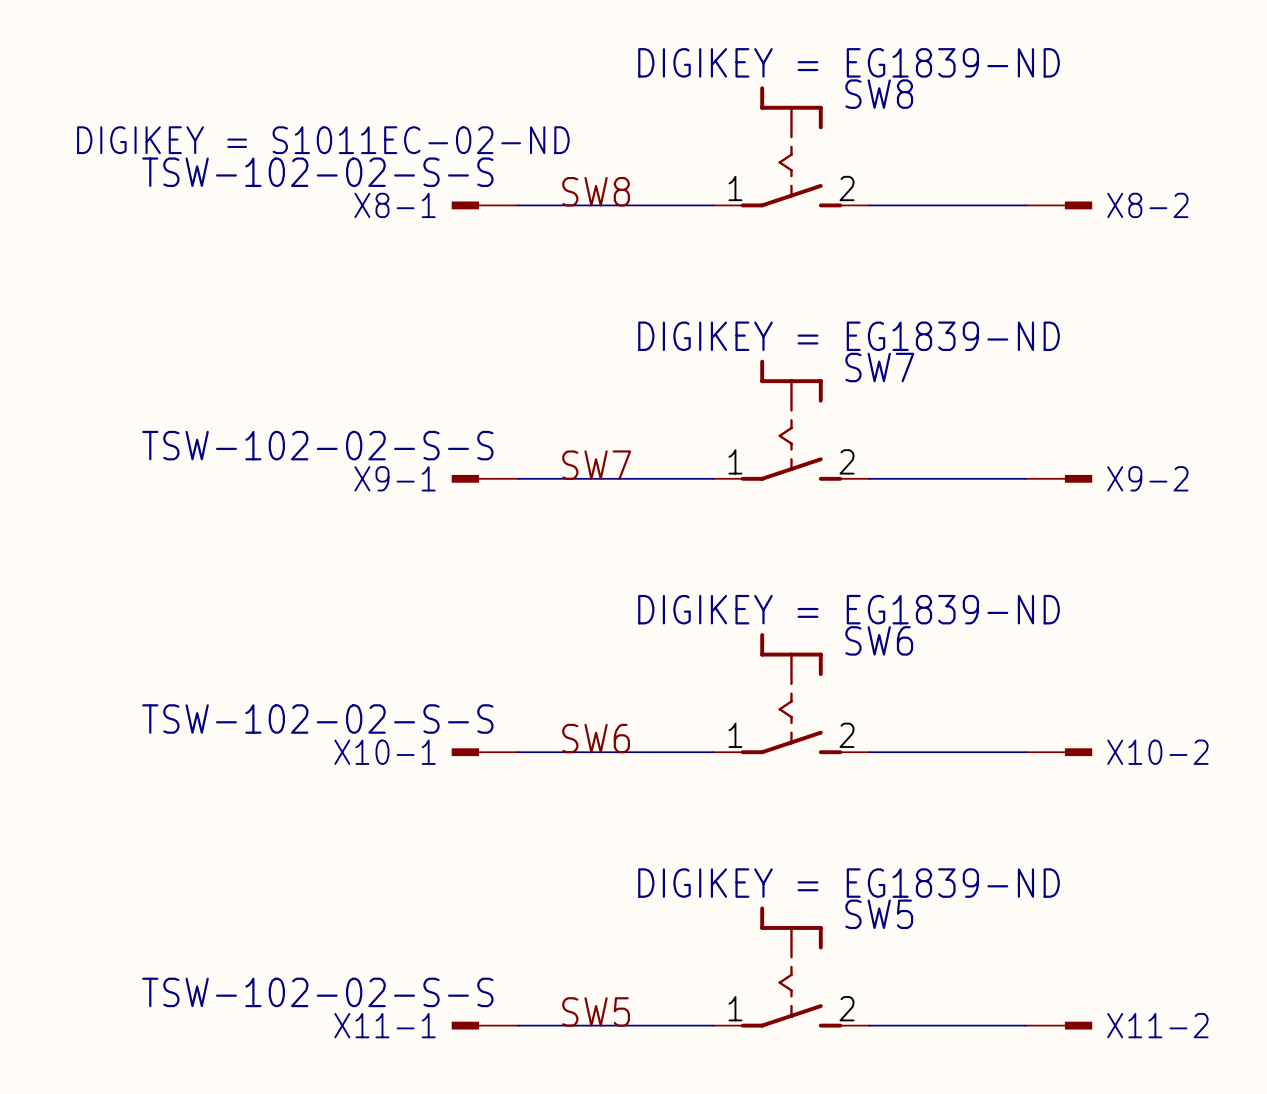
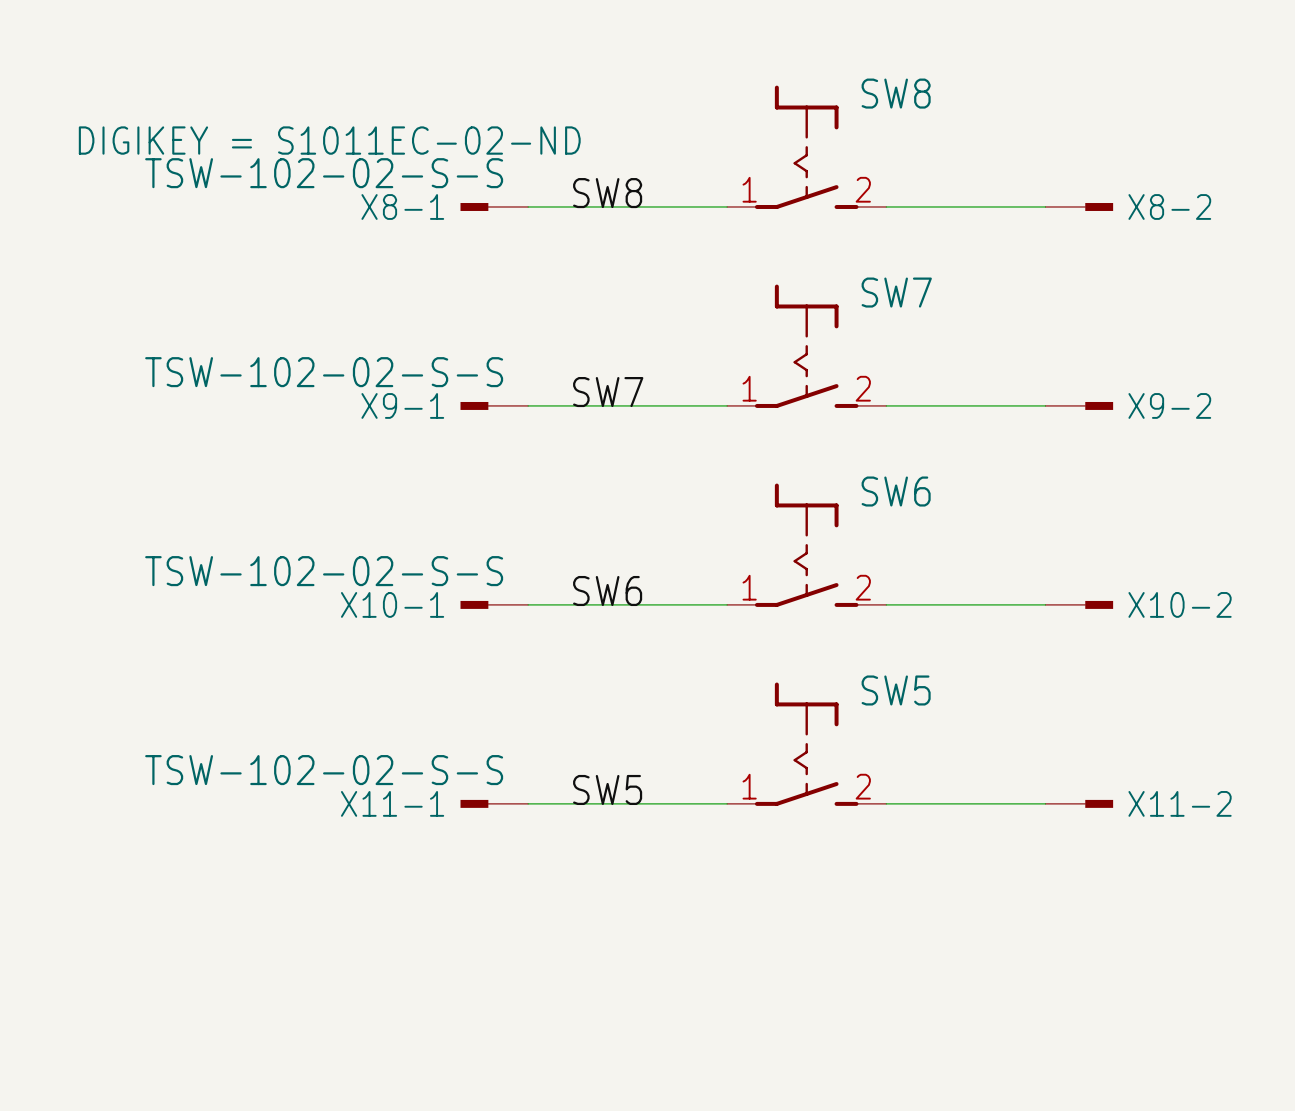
SW8 text: DIGIKEY = EG1839-ND (849, 62) -> none
SW7 text: DIGIKEY = EG1839-ND (849, 336) -> none
SW7 position: (791, 420) -> (806, 346)
label position: SW7 (596, 465) -> SW7 (608, 392)
X9-1 position: (484, 478) -> (494, 405)
wire: (518, 478) (713, 478) -> (528, 405) (727, 405)
wire: (869, 478) (1025, 478) -> (886, 405) (1045, 405)
X9-2 position: (1059, 478) -> (1079, 405)
wire: none -> (528, 604) (727, 604)
wire: none -> (886, 604) (1045, 604)
SW6 text: DIGIKEY = EG1839-ND (849, 609) -> none
SW6 position: (791, 693) -> (806, 545)
label position: SW6 (596, 738) -> SW6 (607, 591)
X10-1 position: (484, 752) -> (494, 604)
wire: (518, 752) (713, 752) -> (528, 803) (727, 803)
wire: (869, 752) (1025, 752) -> (886, 803) (1045, 803)
X10-2 position: (1059, 752) -> (1079, 604)
SW5 text: DIGIKEY = EG1839-ND (849, 883) -> none
SW5 position: (791, 967) -> (806, 744)
label position: SW5 (596, 1011) -> SW5 (607, 789)
X11-1 position: (484, 1025) -> (494, 803)
wire: (518, 1025) (713, 1025) -> none
wire: (869, 1025) (1025, 1025) -> none
X11-2 position: (1059, 1025) -> (1079, 803)

